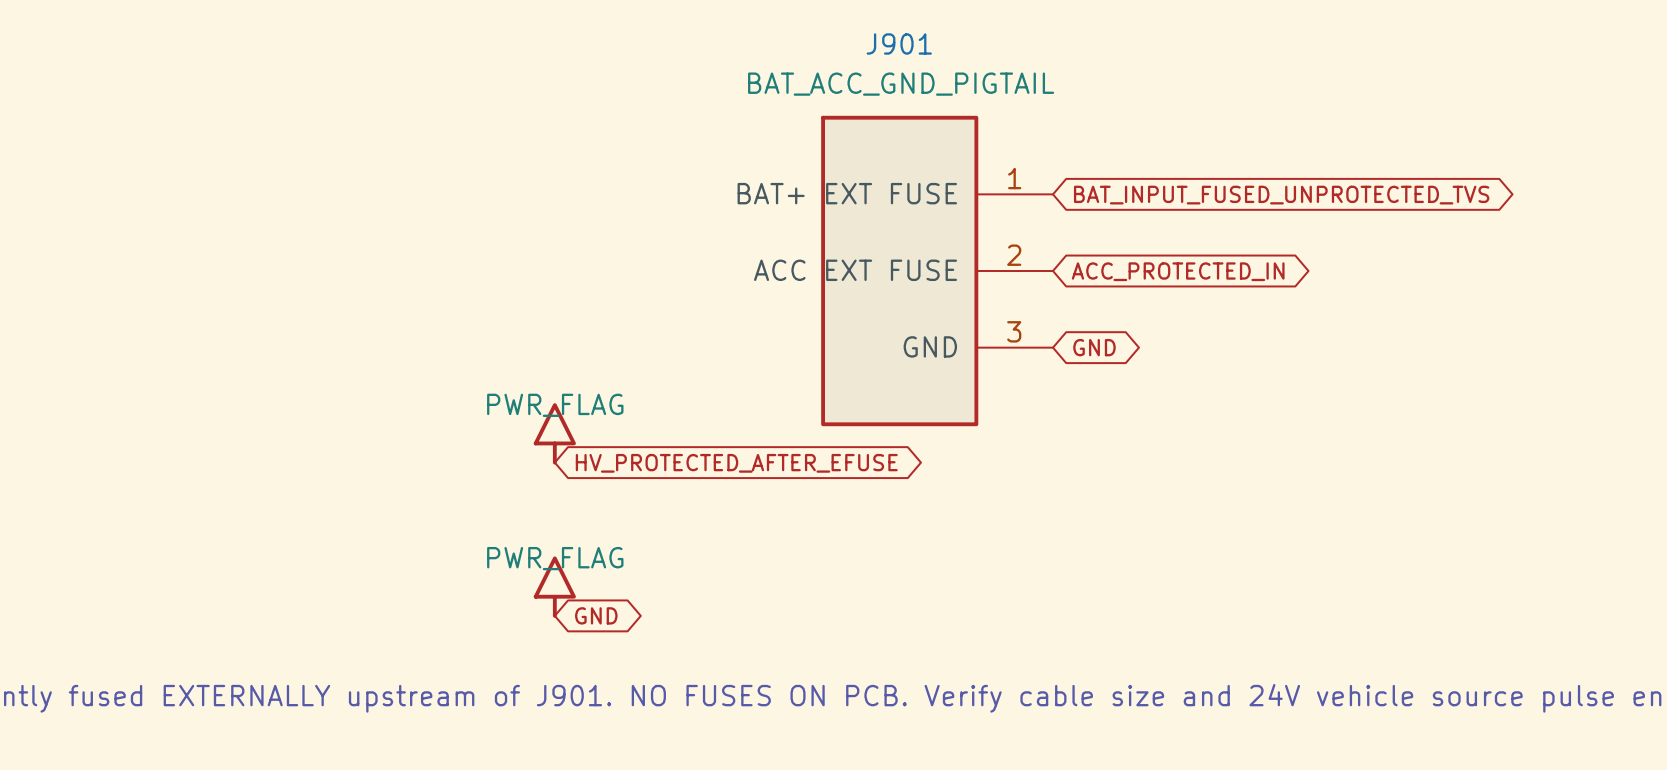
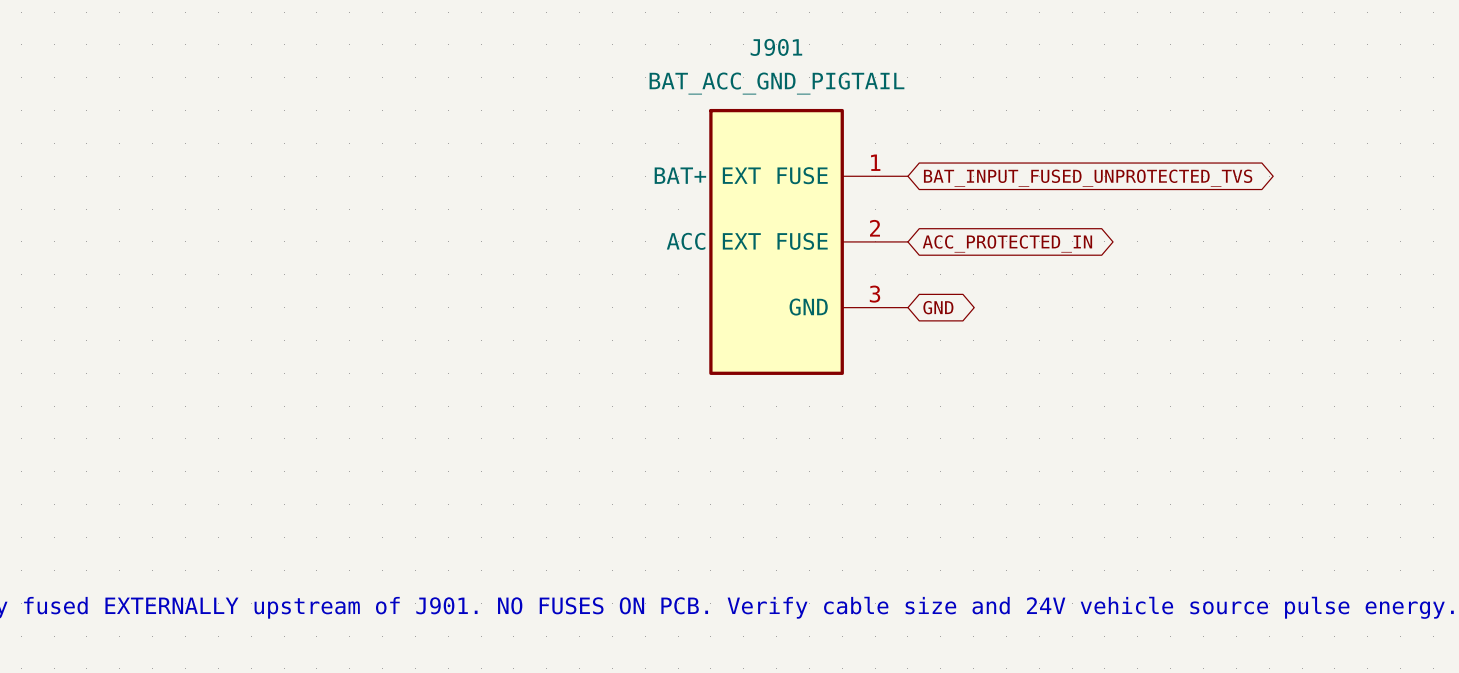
power symbol: PWR_FLAG (554, 433) -> none
global label: HV_PROTECTED_AFTER_EFUSE (736, 463) -> none
power symbol: PWR_FLAG (554, 587) -> none
global label: GND (596, 615) -> none

